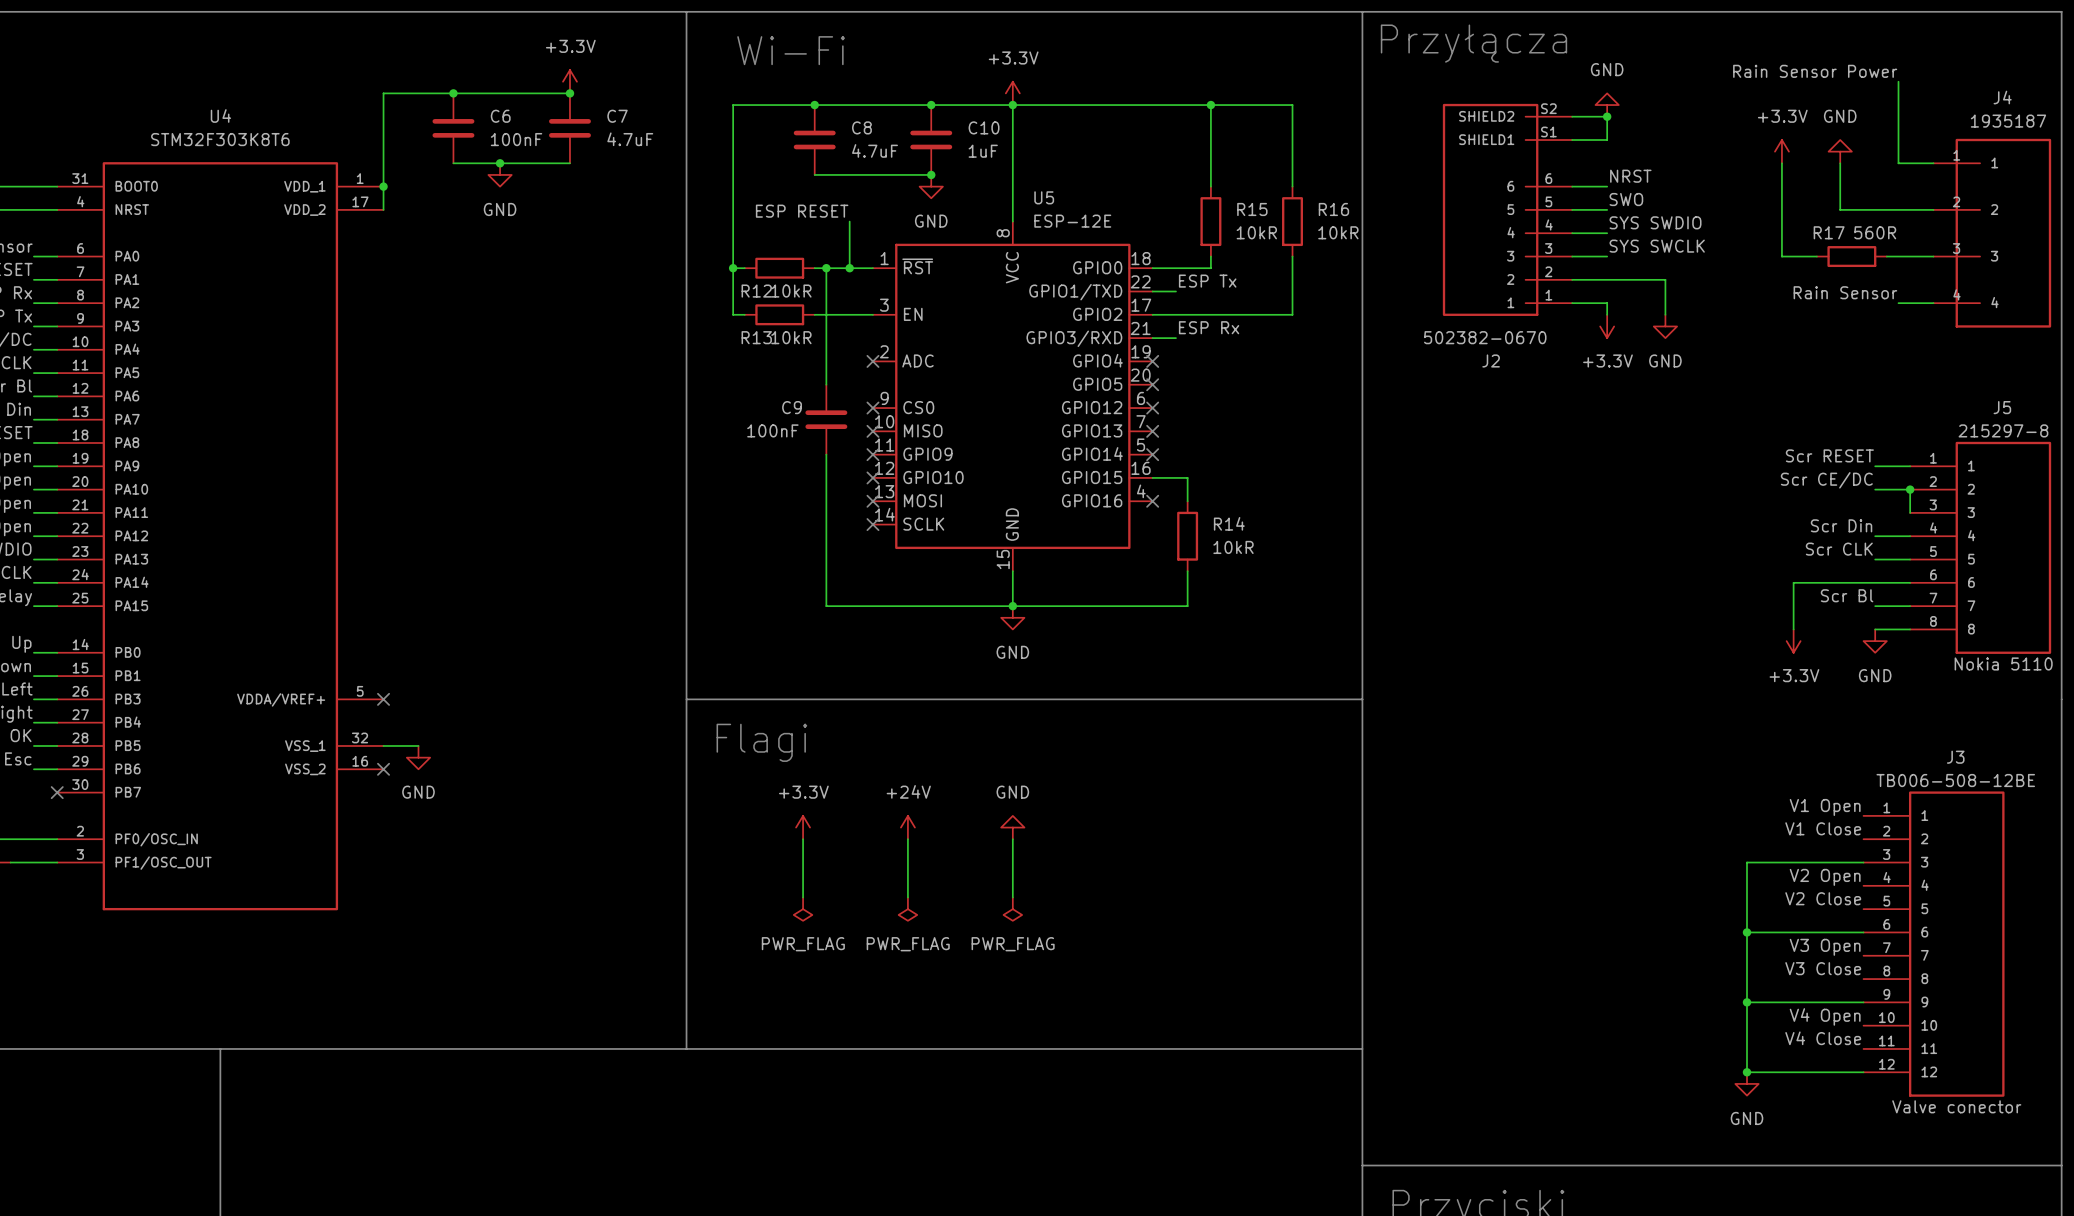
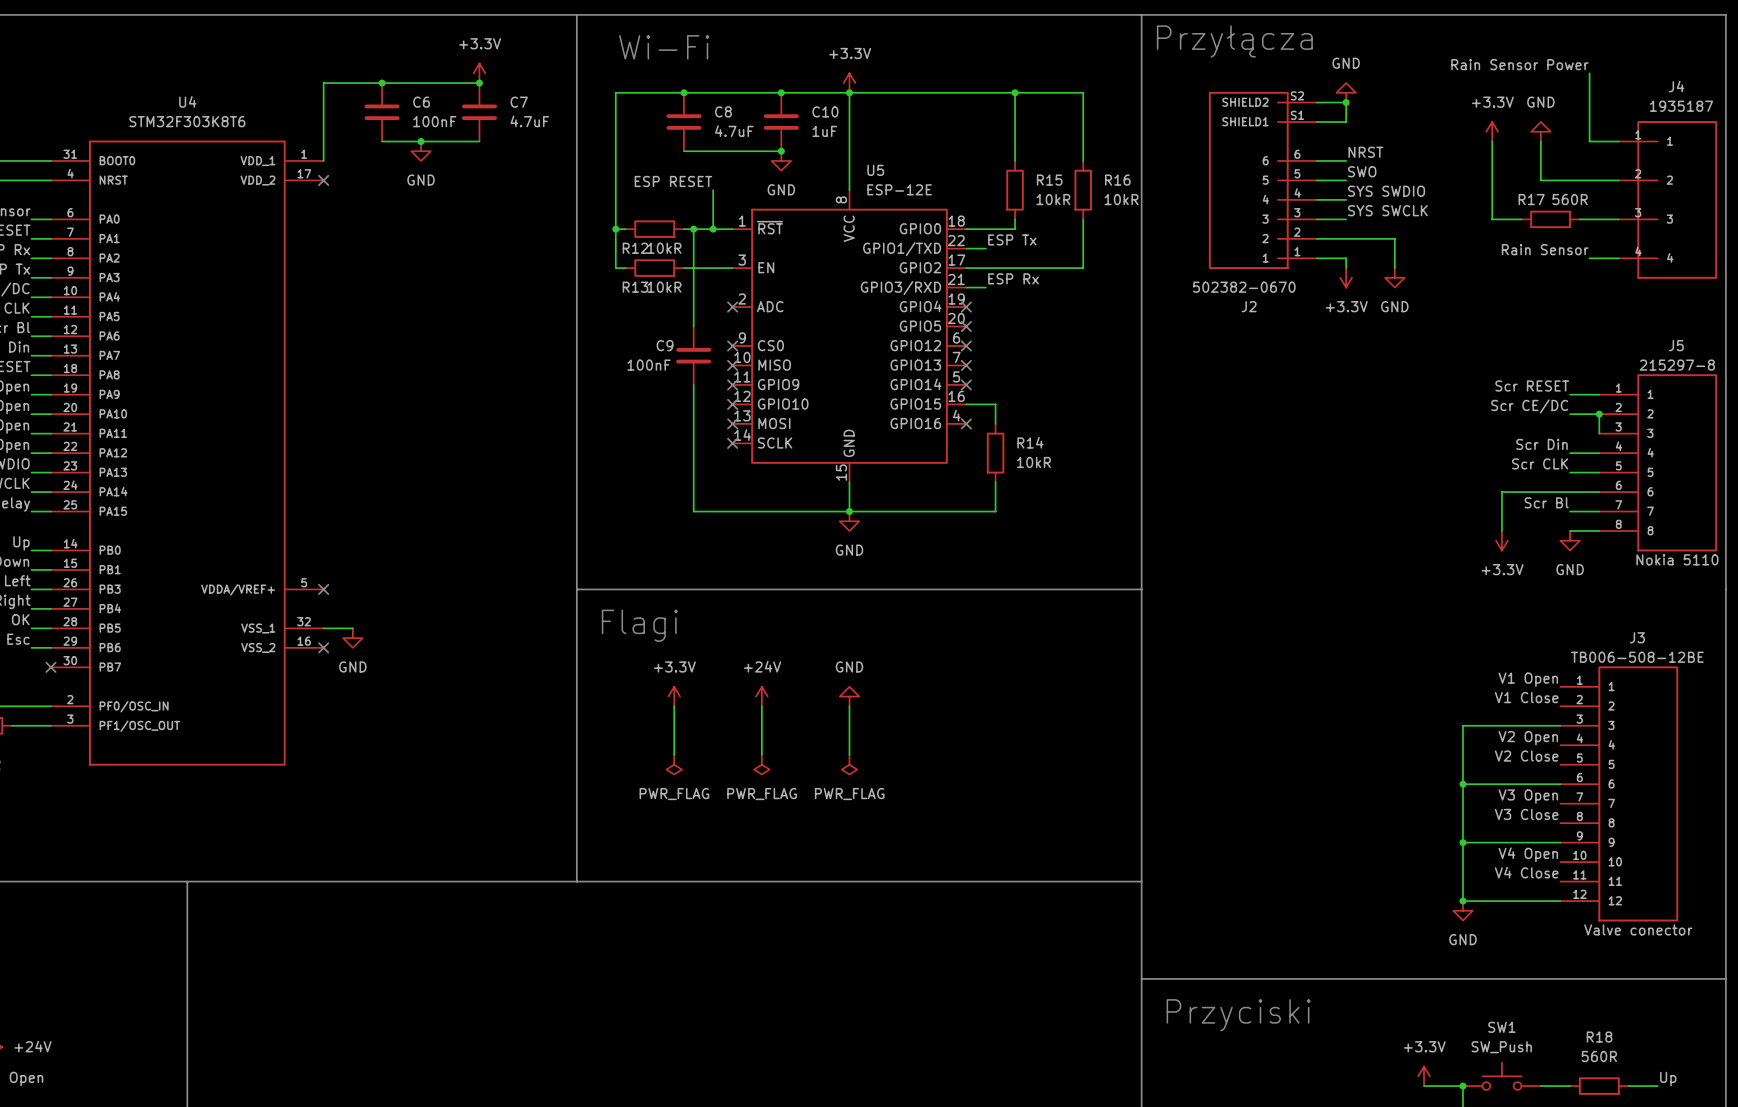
wire: (383, 186) (383, 209) -> none
junction: (383, 186) -> none
no-connect mark: none -> (323, 180)

